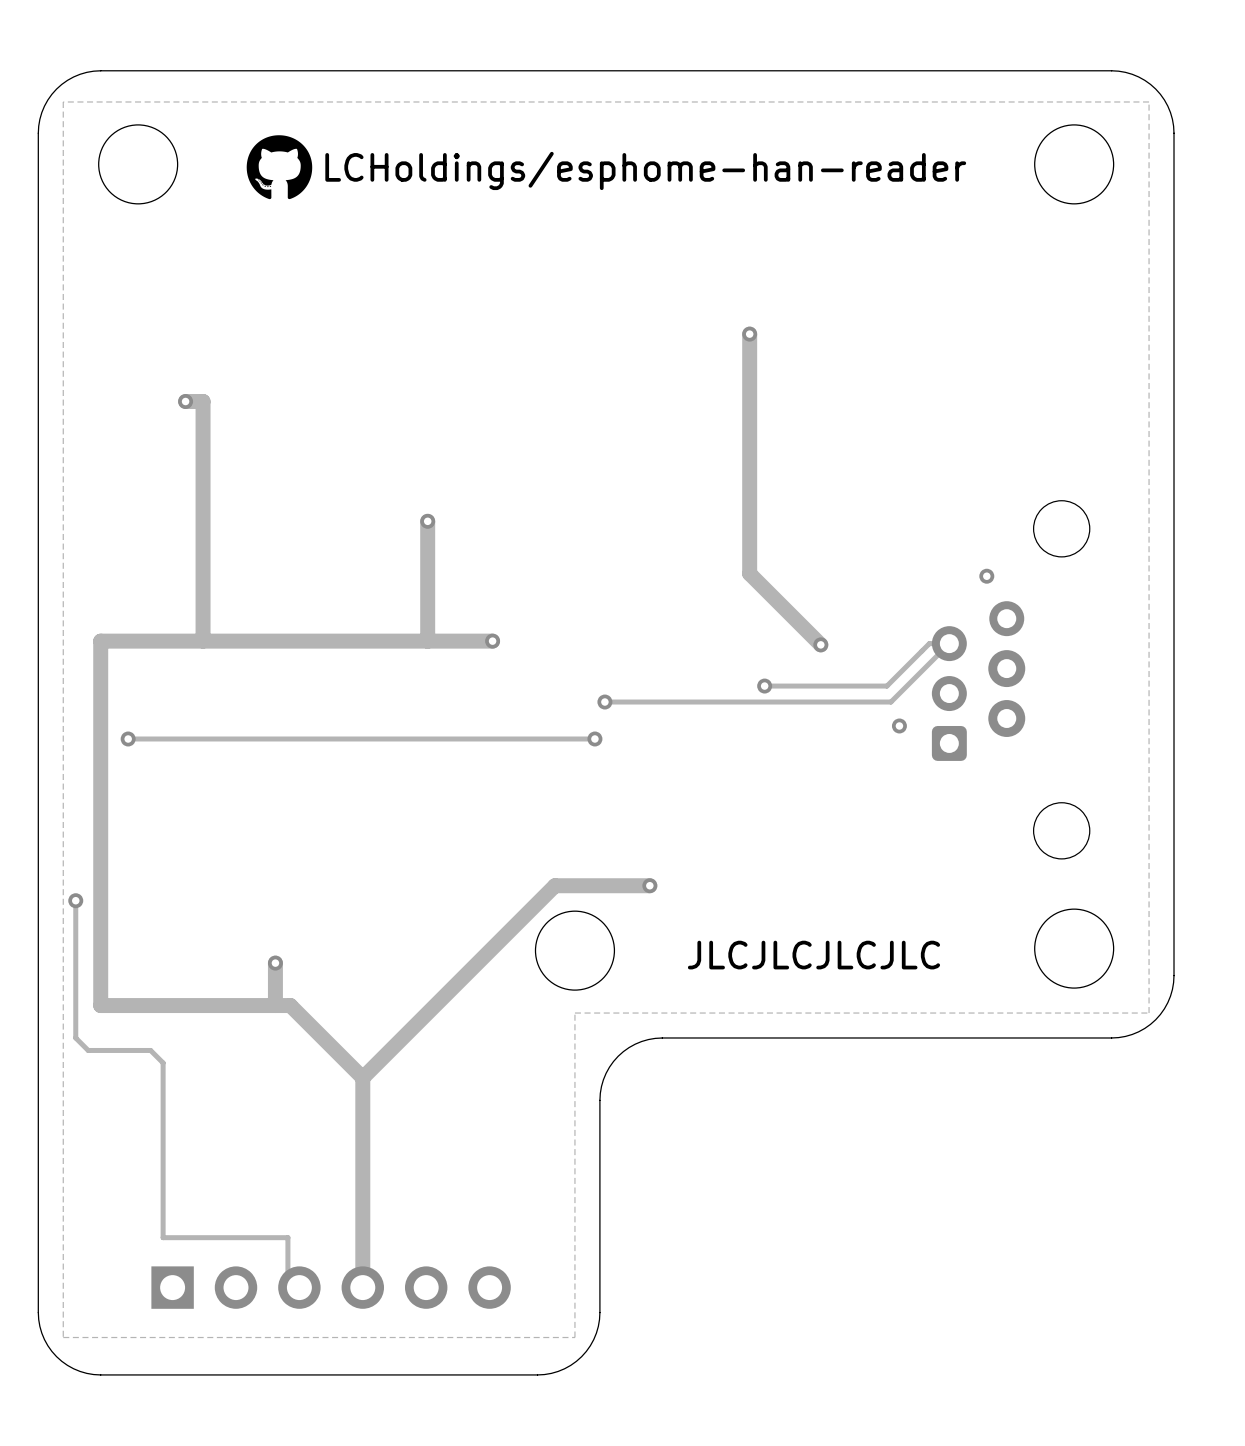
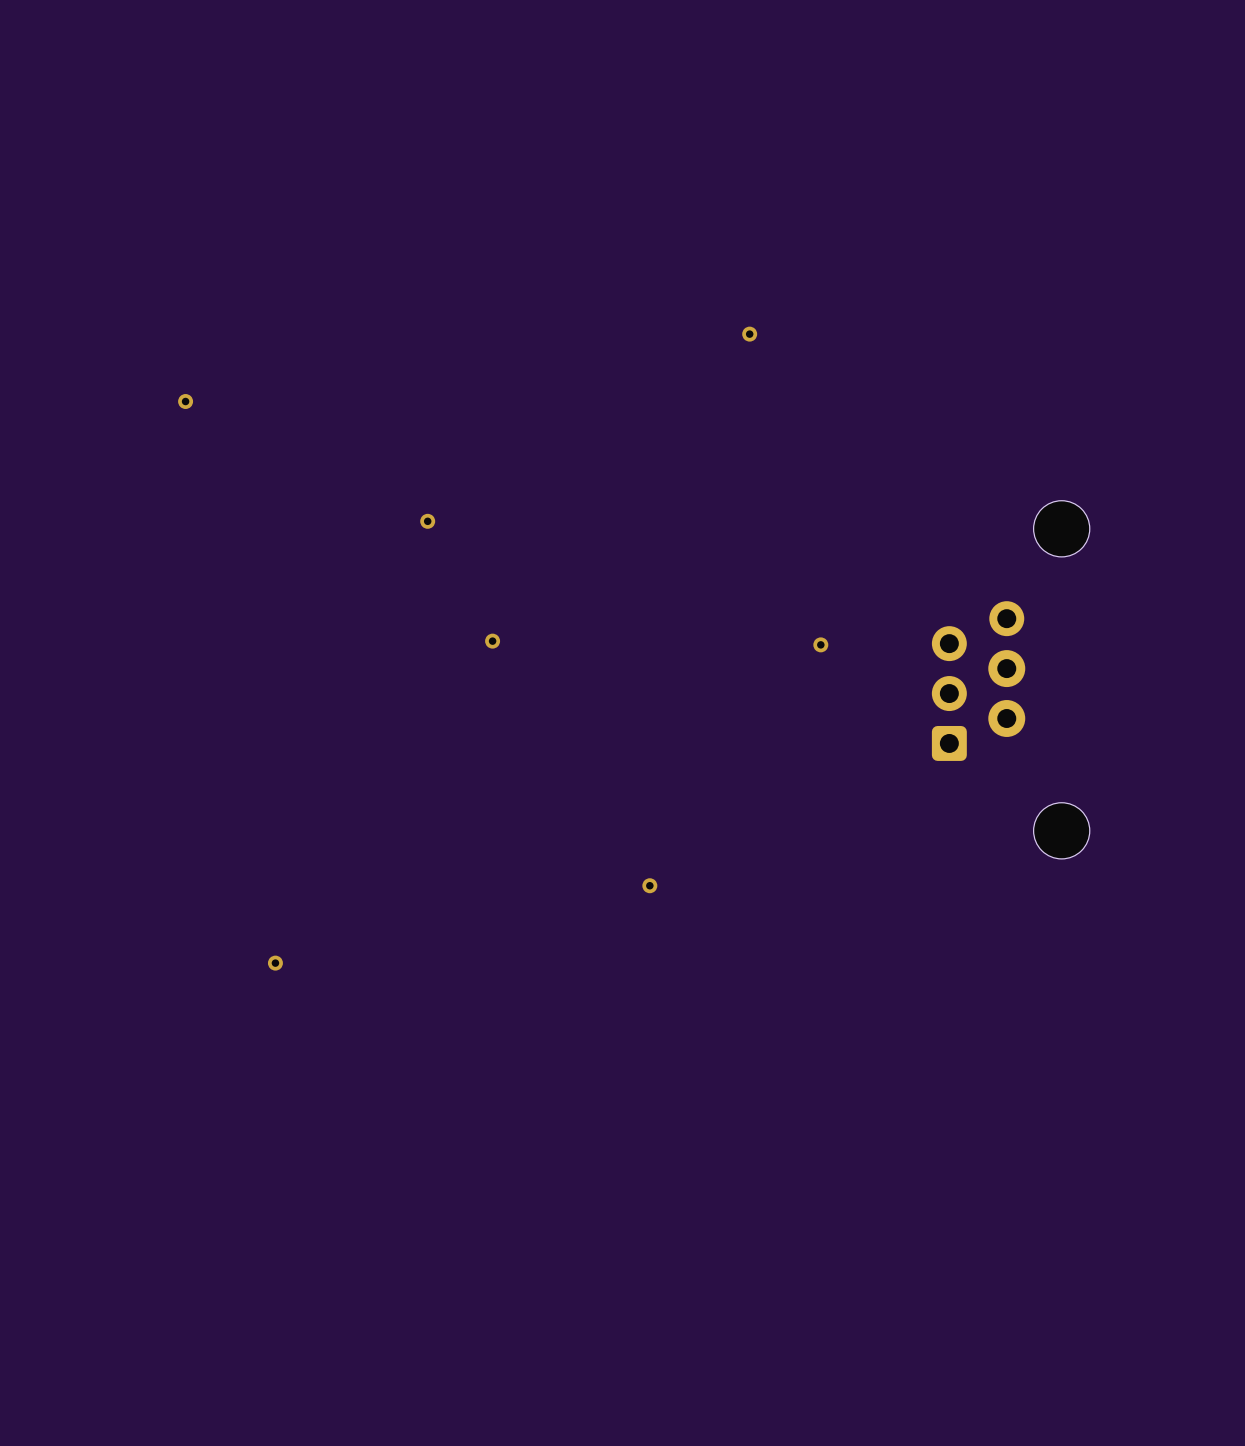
board edge: (1111, 70) (100, 70) (86, 72) (73, 76) (61, 84) (51, 94) (41, 112) (38, 133) (38, 1312) (39, 1326) (44, 1339) (51, 1351) (61, 1361) (80, 1371) (100, 1374) (537, 1374) (558, 1371) (570, 1365) (586, 1351) (593, 1339) (598, 1326) (600, 1093) (603, 1079) (609, 1067) (618, 1056) (629, 1047) (641, 1041) (662, 1037) (1118, 1037) (1138, 1031) (1150, 1024) (1160, 1014) (1170, 996) (1174, 975) (1174, 133) (1172, 119) (1167, 106) (1155, 89) (1138, 76) (1125, 72) (1111, 70) -> none
zone outline: (1149, 101) (63, 101) (63, 1337) (574, 1337) (574, 1013) (1149, 1013) (1149, 101) -> none
round board edge: [98, 124, 179, 205] -> none
round board edge: [1034, 124, 1115, 205] -> none
drawing: [246, 135, 313, 200] -> none
text: LCHoldings/esphome-han-reader (645, 170) -> none
track: (749, 334) (749, 573) (820, 644) -> none
track: (185, 401) (203, 401) (203, 641) -> none
track: (427, 521) (427, 641) -> none
via: (986, 576) -> none
track: (492, 641) (100, 641) (100, 1005) (290, 1005) (362, 1077) -> none
track: (764, 686) (886, 686) (929, 643) (949, 643) (890, 702) (604, 702) -> none
via: (764, 686) -> none
via: (604, 702) -> none
via: (899, 725) -> none
via: (128, 738) -> none
track: (594, 738) (128, 738) -> none
via: (594, 738) -> none
track: (649, 885) (554, 885) (362, 1077) -> none
track: (75, 900) (75, 1037) (88, 1050) (150, 1050) (163, 1062) (163, 1237) (287, 1237) (287, 1276) (299, 1287) -> none
via: (75, 900) -> none
round board edge: [1034, 908, 1115, 989] -> none
round board edge: [534, 910, 616, 991] -> none
text: JLCJLCJLCJLC (813, 955) -> none
track: (275, 963) (275, 1005) -> none
track: (362, 1077) (362, 1287) -> none
part: (331, 1287) -> none

